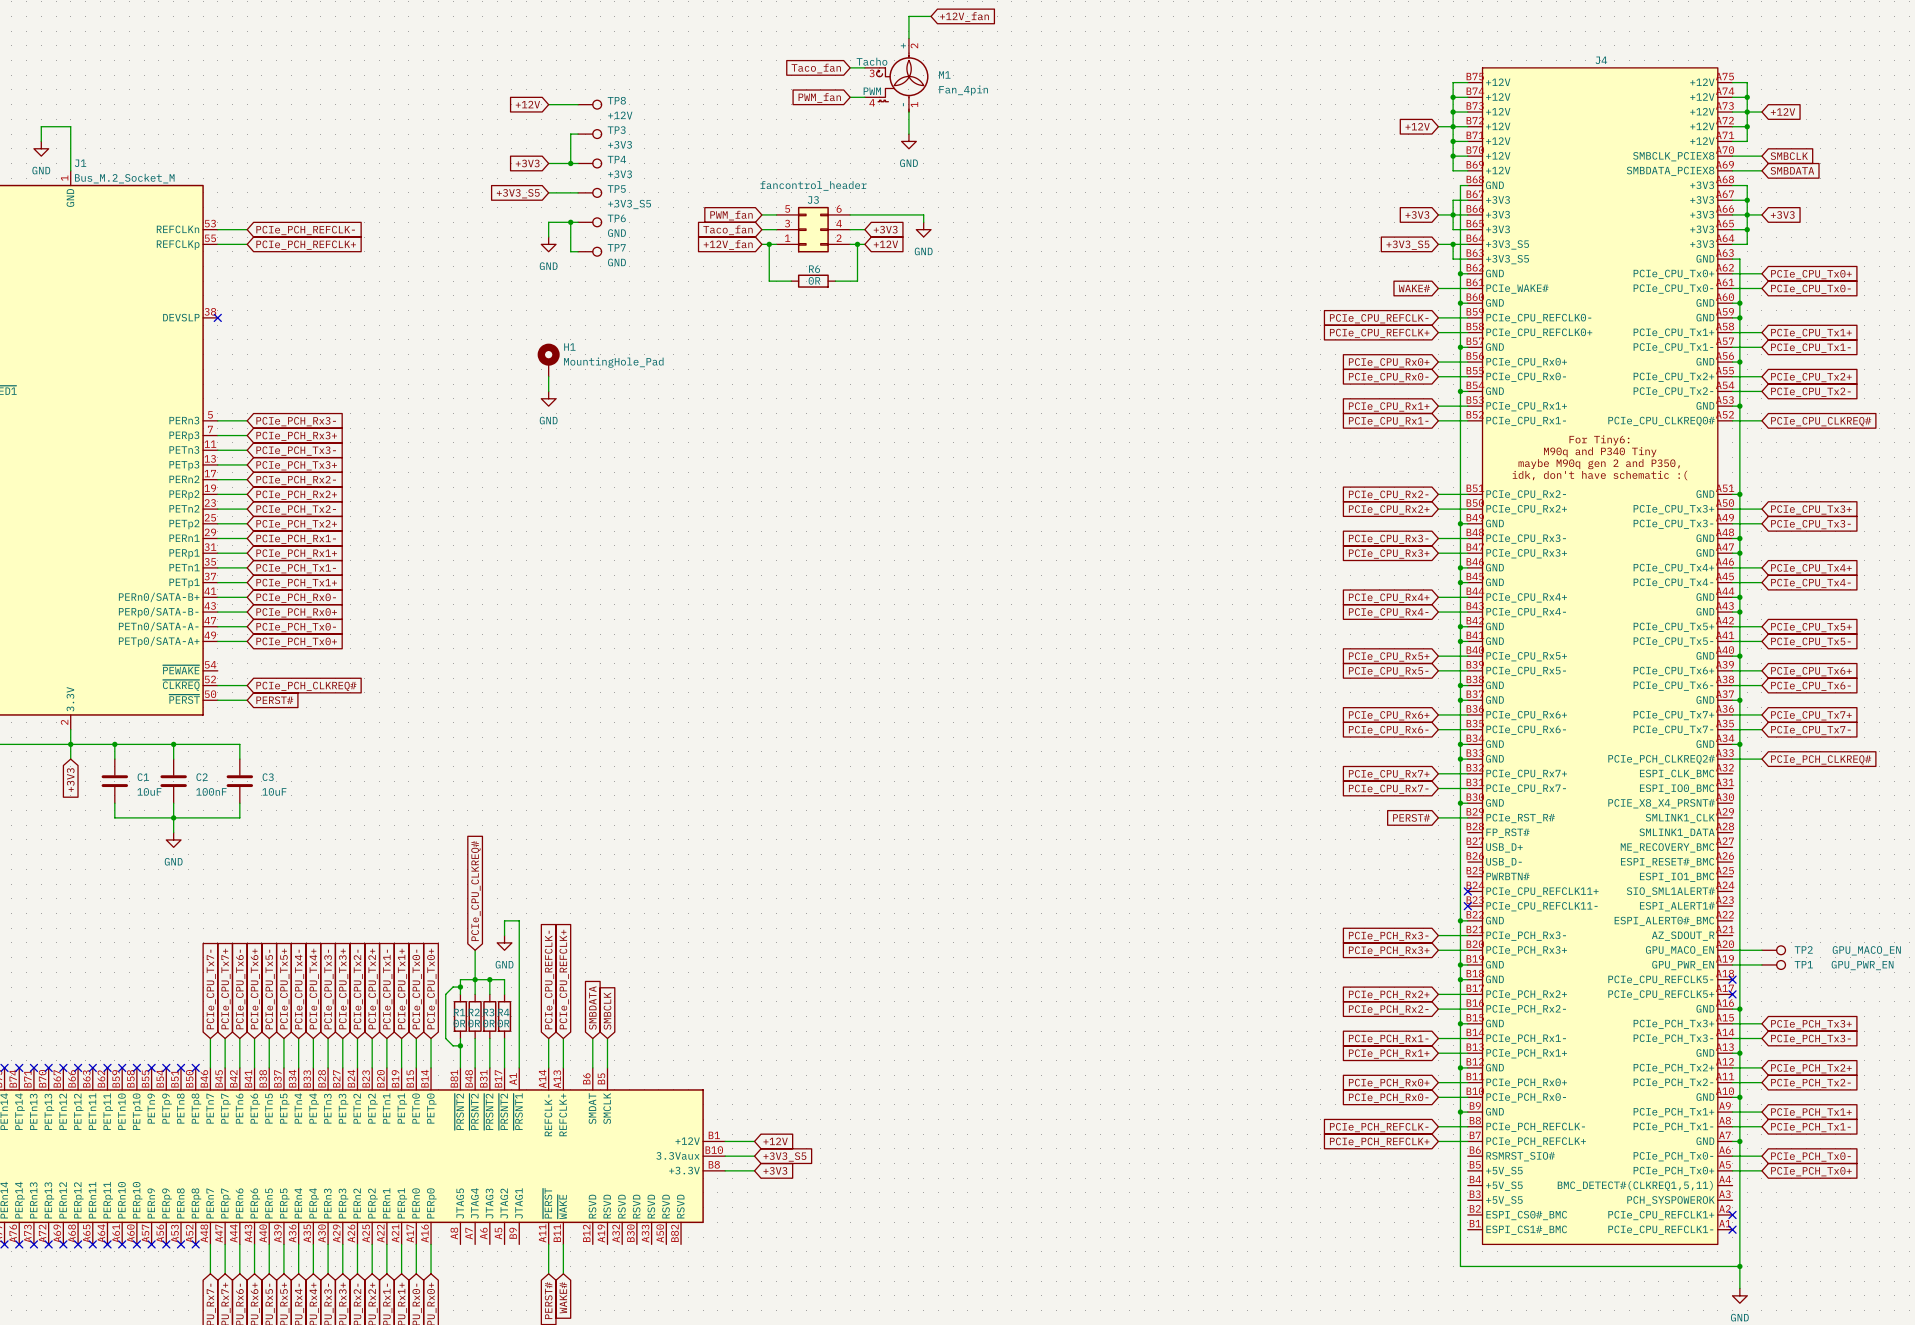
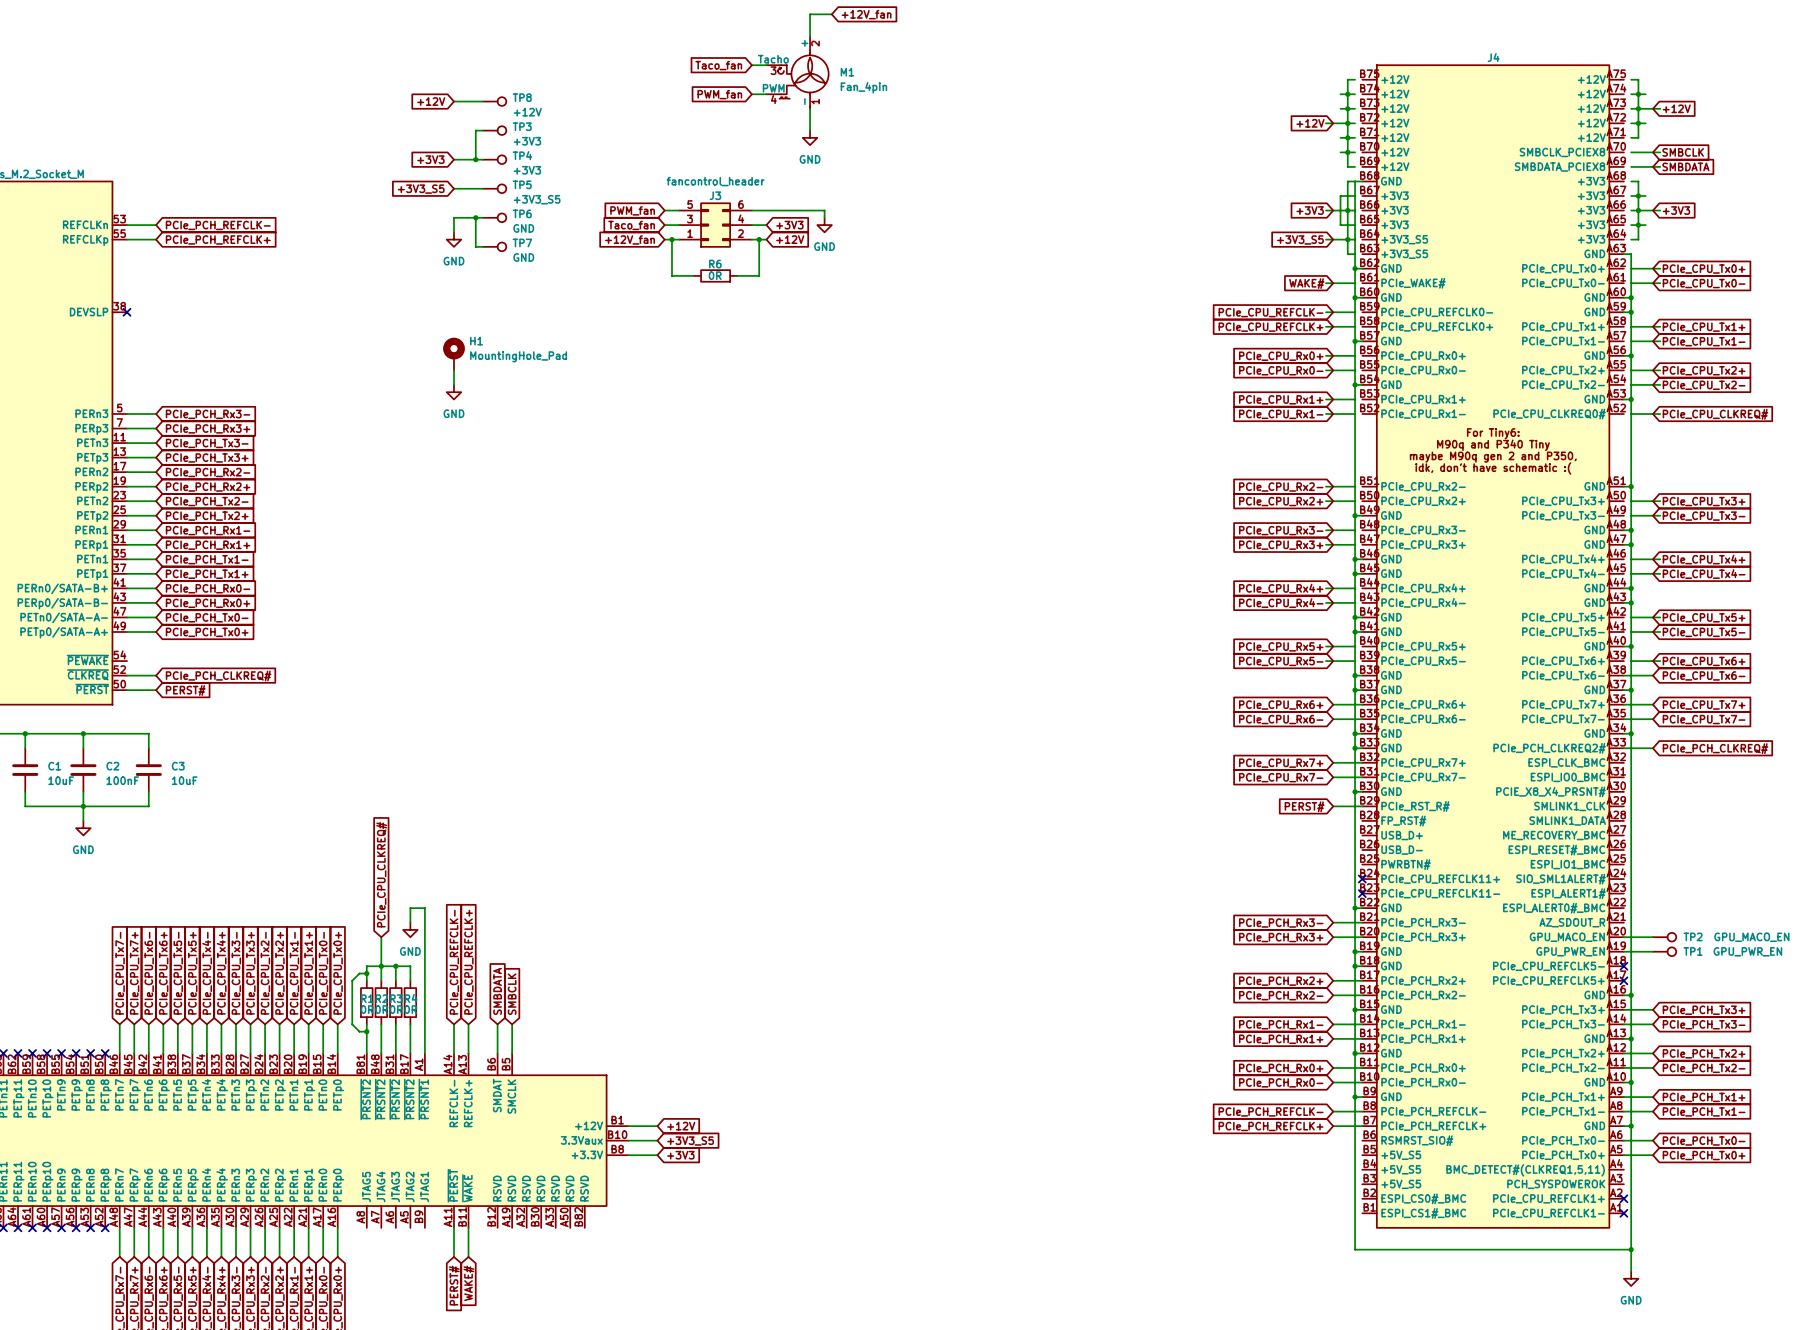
wire: (1460, 82) (1467, 82) -> none
wire: (1732, 82) (1739, 82) -> none
wire: (1460, 97) (1467, 97) -> (1340, 94) (1347, 94)
wire: (1732, 97) (1739, 97) -> (1638, 94) (1645, 94)
wire: (1460, 112) (1467, 112) -> (1340, 108) (1347, 108)
wire: (1732, 112) (1739, 112) -> (1652, 108) (1660, 108)
wire: (1460, 126) (1467, 126) -> (1325, 123) (1333, 123)
wire: (1732, 126) (1739, 126) -> (1638, 123) (1645, 123)
wire: (1460, 141) (1467, 141) -> (1340, 137) (1347, 137)
wire: (1732, 141) (1739, 141) -> none
wire: (1460, 156) (1467, 156) -> (1340, 152) (1347, 152)
wire: (1732, 156) (1739, 156) -> (1652, 152) (1660, 152)
wire: (1460, 170) (1467, 170) -> none
wire: (1732, 170) (1739, 170) -> (1652, 166) (1660, 166)
wire: none -> (1355, 181) (1347, 181) (1347, 196) (1340, 196) (1340, 225) (1347, 225) (1347, 239)
wire: (1732, 185) (1739, 185) -> none
wire: (1460, 200) (1467, 200) -> none
wire: (1732, 200) (1739, 200) -> (1638, 196) (1645, 196)
wire: (1460, 214) (1467, 214) -> (1325, 210) (1333, 210)
wire: (1732, 214) (1739, 214) -> (1652, 210) (1660, 210)
wire: (1460, 229) (1467, 229) -> none
wire: (1732, 229) (1739, 229) -> (1638, 225) (1645, 225)
wire: (1460, 244) (1467, 244) -> (1325, 239) (1333, 239)
wire: (1732, 244) (1739, 244) -> none
wire: (1460, 259) (1467, 259) -> none
wire: (1732, 273) (1739, 273) -> (1652, 268) (1660, 268)
wire: (1460, 288) (1467, 288) -> (1325, 283) (1333, 283)
wire: (1732, 288) (1739, 288) -> (1652, 283) (1660, 283)
wire: (1460, 317) (1467, 317) -> (1325, 312) (1333, 312)
wire: (1460, 332) (1467, 332) -> (1325, 326) (1333, 326)
wire: (1732, 332) (1739, 332) -> (1652, 326) (1660, 326)
wire: (1732, 347) (1739, 347) -> (1652, 341) (1660, 341)
wire: (1460, 362) (1467, 362) -> (1325, 355) (1333, 355)
wire: (1460, 376) (1467, 376) -> (1325, 370) (1333, 370)
wire: (1732, 376) (1739, 376) -> (1652, 370) (1660, 370)
wire: (1732, 391) (1739, 391) -> (1652, 384) (1660, 384)
wire: (1460, 406) (1467, 406) -> (1325, 399) (1333, 399)
wire: (1460, 420) (1467, 420) -> (1325, 414) (1333, 414)
wire: (1732, 420) (1739, 420) -> (1652, 414) (1660, 414)
wire: (1460, 494) (1467, 494) -> (1325, 486) (1333, 486)
wire: (1460, 509) (1467, 509) -> (1325, 501) (1333, 501)
wire: (1732, 509) (1739, 509) -> (1652, 501) (1660, 501)
wire: (1732, 523) (1739, 523) -> (1652, 515) (1660, 515)
wire: (1460, 538) (1467, 538) -> (1325, 530) (1333, 530)
wire: (1460, 553) (1467, 553) -> (1325, 544) (1333, 544)
wire: (1732, 567) (1739, 567) -> (1652, 559) (1660, 559)
wire: (1732, 582) (1739, 582) -> (1652, 573) (1660, 573)
wire: (1460, 597) (1467, 597) -> (1325, 588) (1333, 588)
wire: (1460, 612) (1467, 612) -> (1325, 602) (1333, 602)
wire: (1732, 626) (1739, 626) -> (1652, 617) (1660, 617)
wire: (1732, 641) (1739, 641) -> (1652, 632) (1660, 632)
wire: (1460, 656) (1467, 656) -> (1325, 646) (1333, 646)
wire: (1460, 670) (1467, 670) -> (1325, 661) (1333, 661)
wire: (1732, 670) (1739, 670) -> (1652, 661) (1660, 661)

